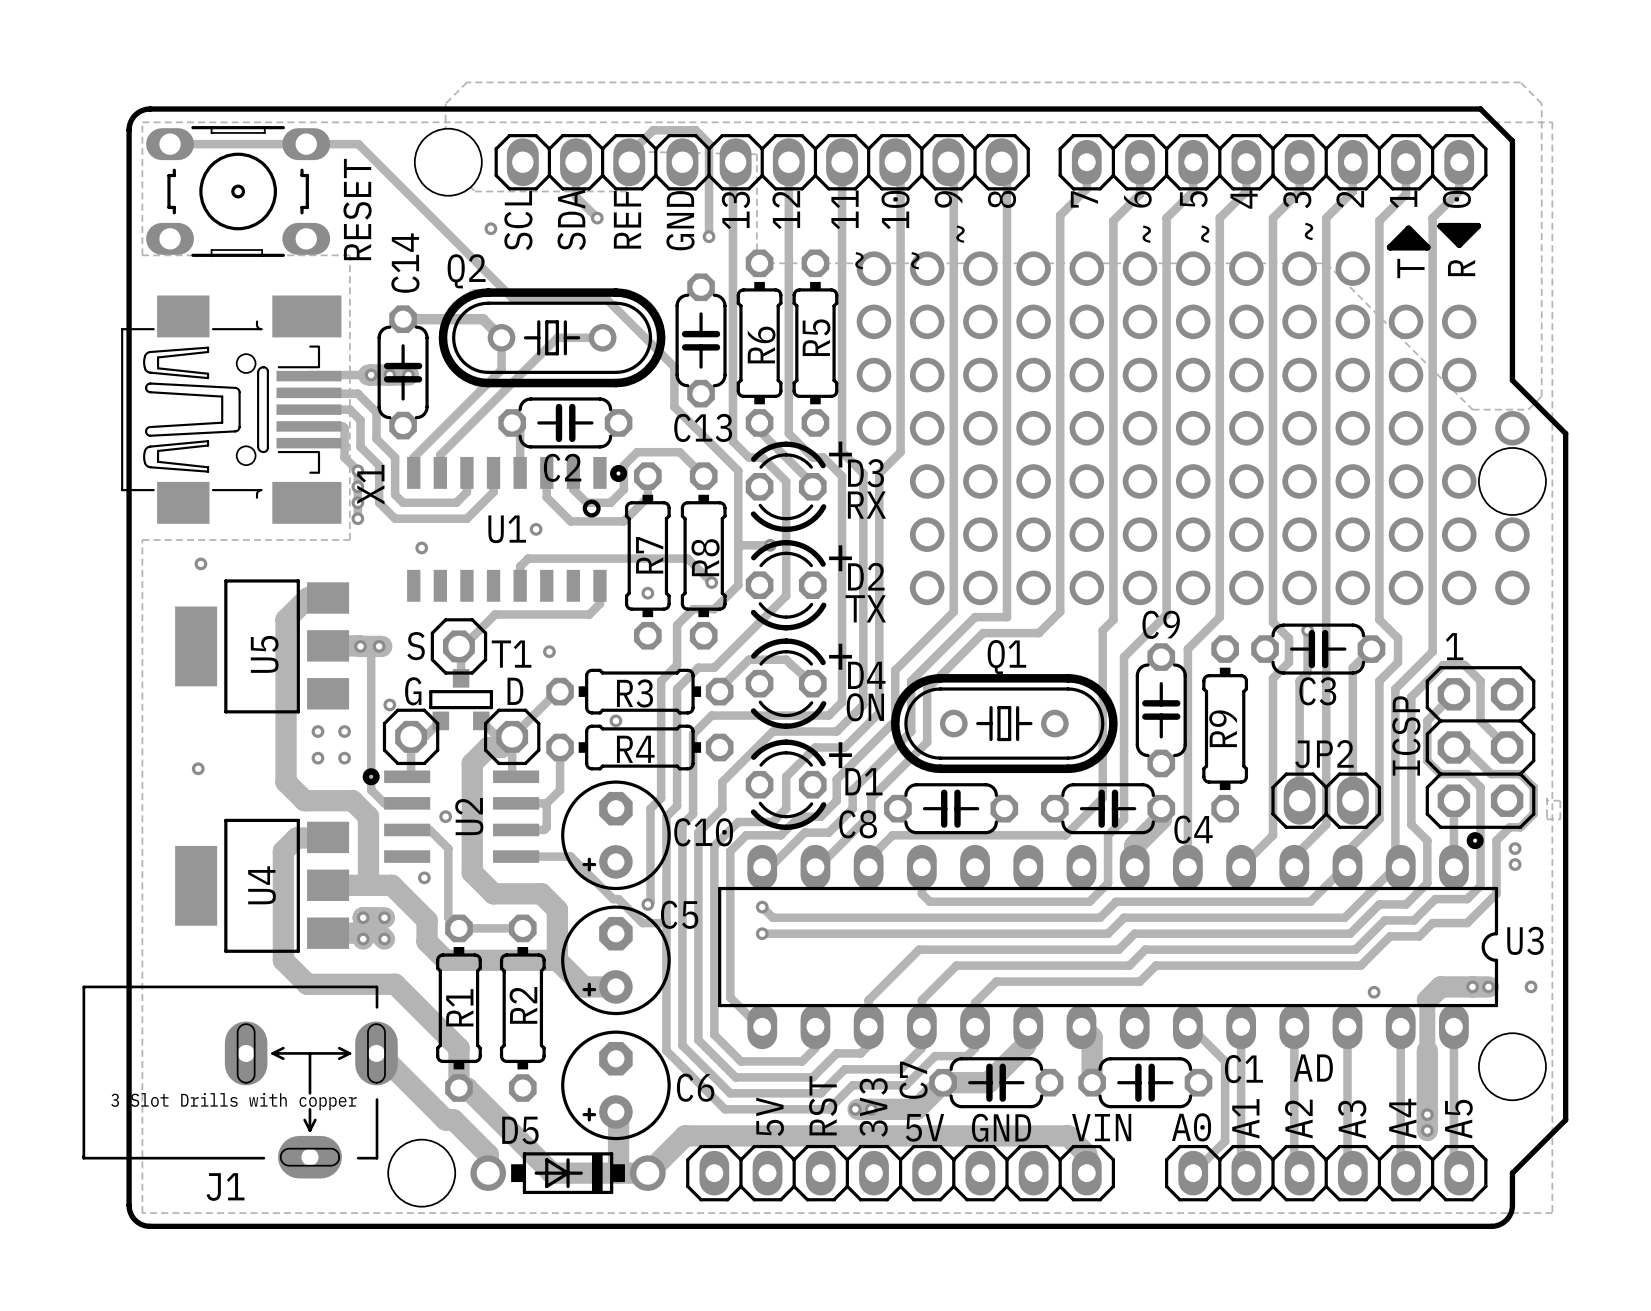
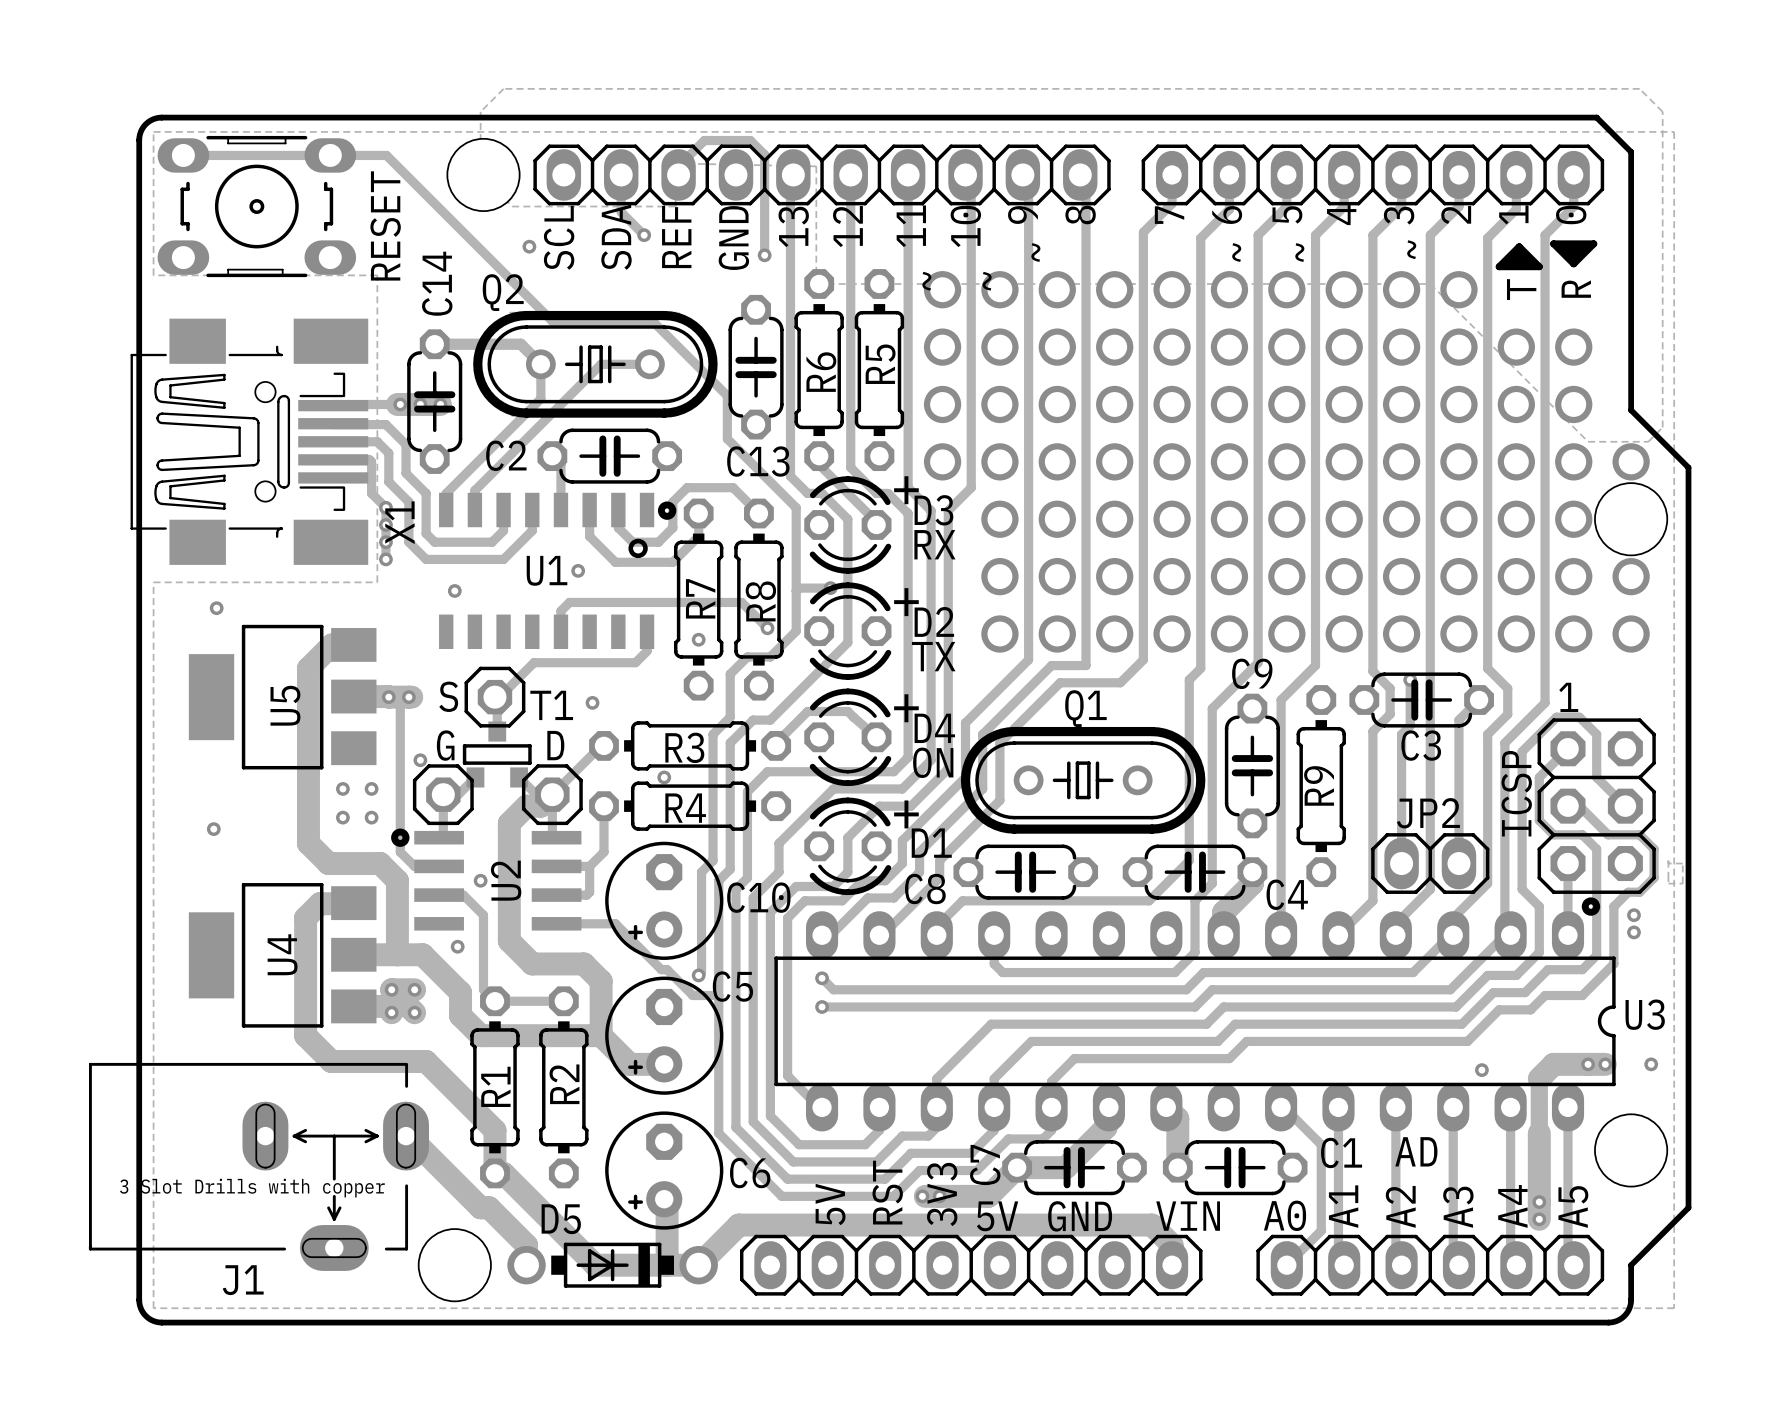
C2 name position: C2 (562, 467) -> C2 (506, 455)

